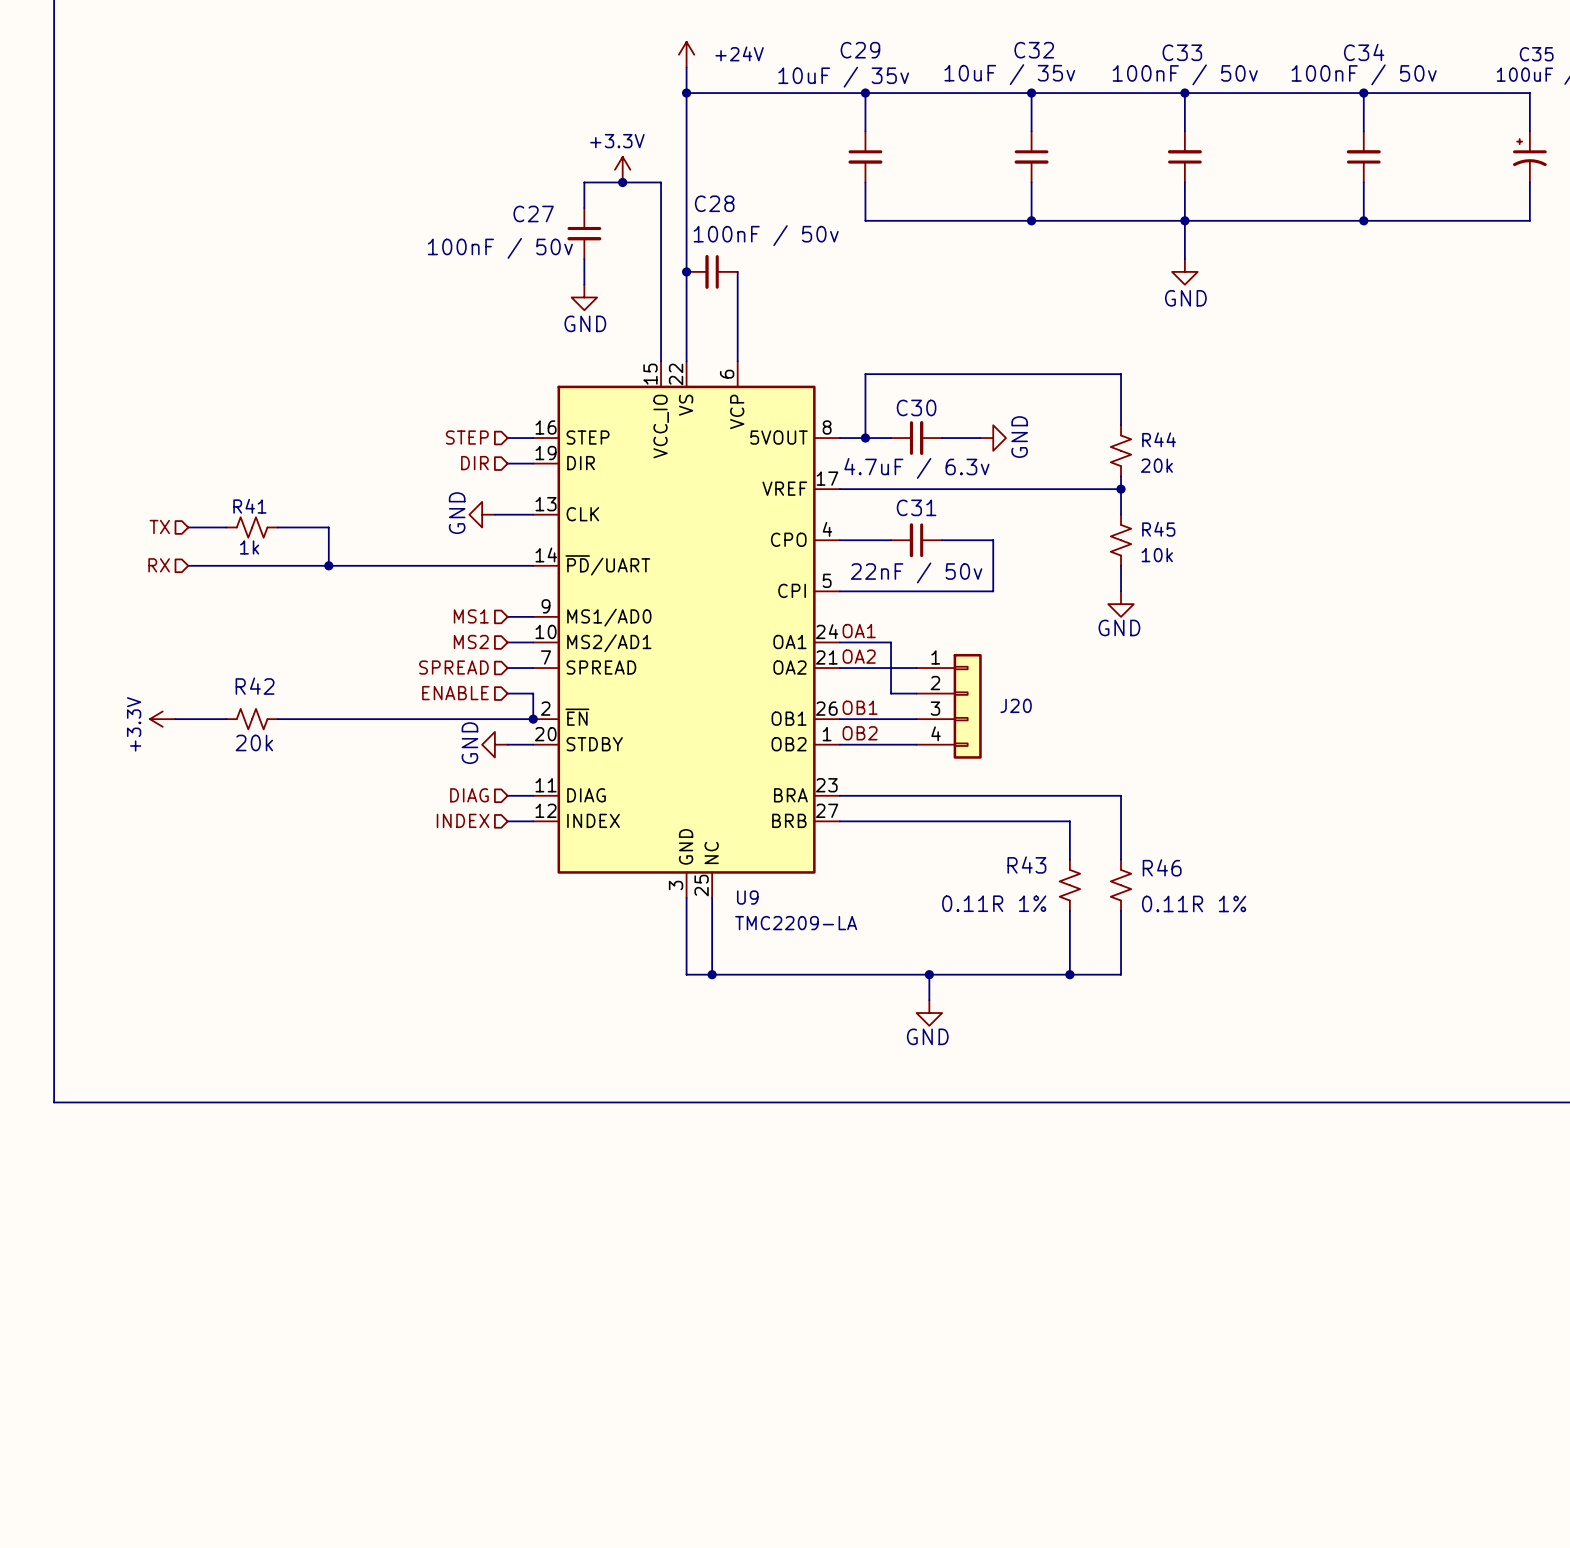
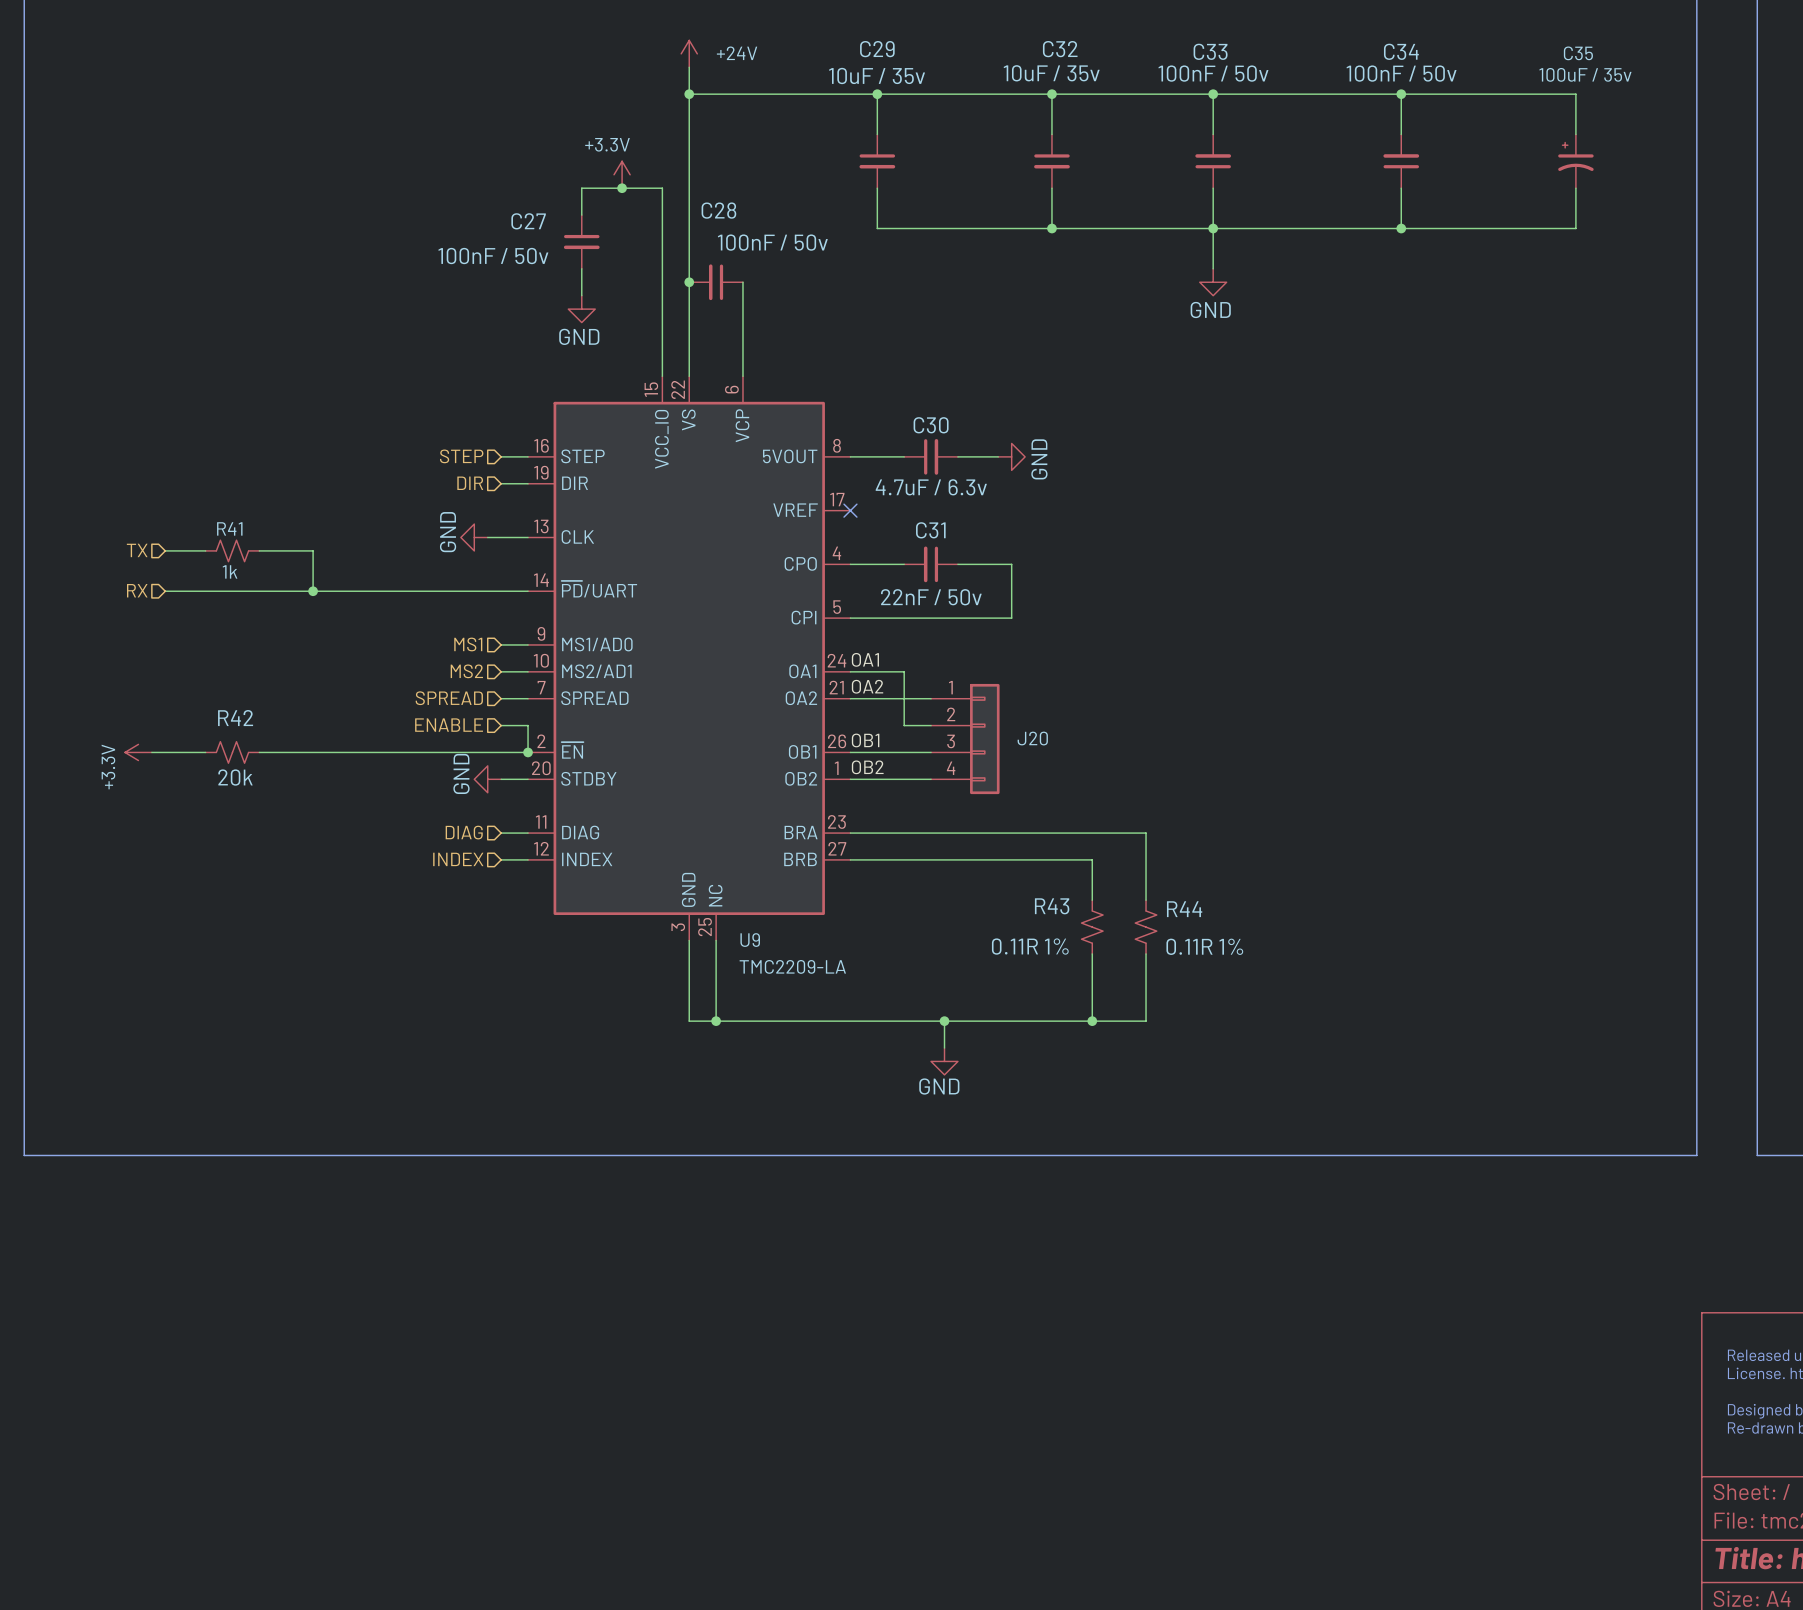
wire: (1121, 425) (1121, 374) (865, 374) (865, 438) -> none
junction: (865, 438) -> none
R44: 20k (1121, 450) -> none
wire: (1121, 476) (1121, 514) -> none
wire: (839, 489) (1121, 489) -> none
no-connect mark: none -> (850, 510)
junction: (1121, 489) -> none
R45: 10k (1121, 540) -> none
wire: (1121, 565) (1121, 591) -> none
power symbol: GND (1121, 604) -> none
R46 name: R46 (1162, 867) -> R44 (1184, 909)

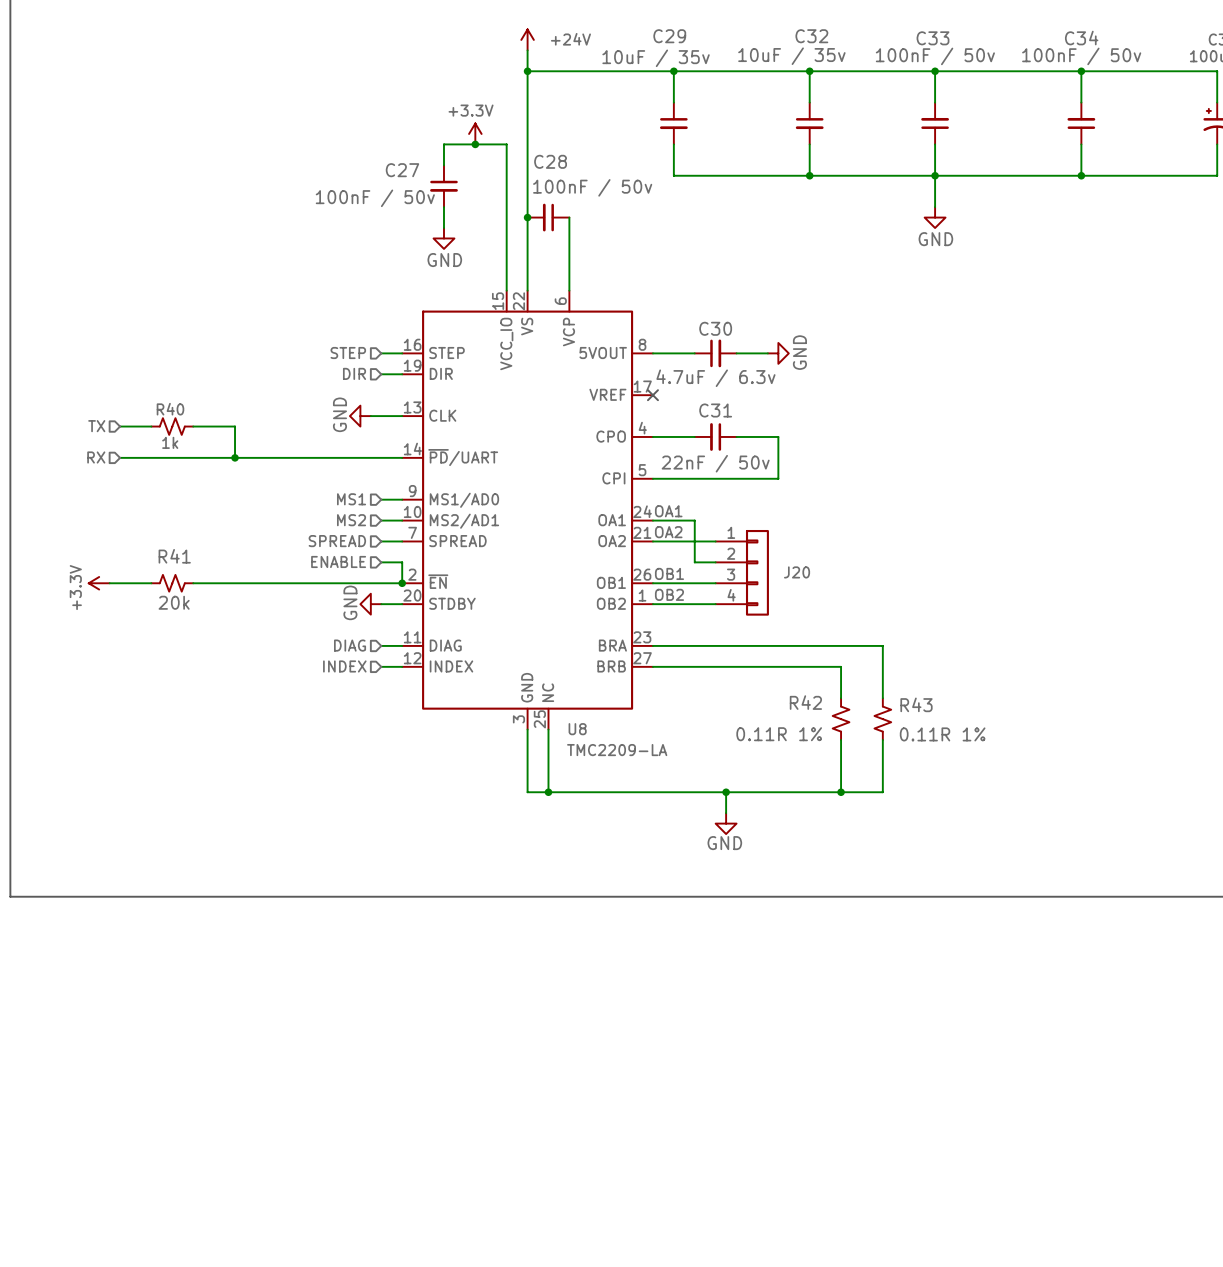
R41 name: R41 (229, 528) -> R40 (170, 409)
R42 name: R42 (235, 718) -> R41 (174, 556)
R43 name: R43 (1052, 906) -> R42 (805, 702)
R44 name: R44 (1184, 909) -> R43 (916, 704)
U9 name: U9 (750, 940) -> U8 (577, 729)

